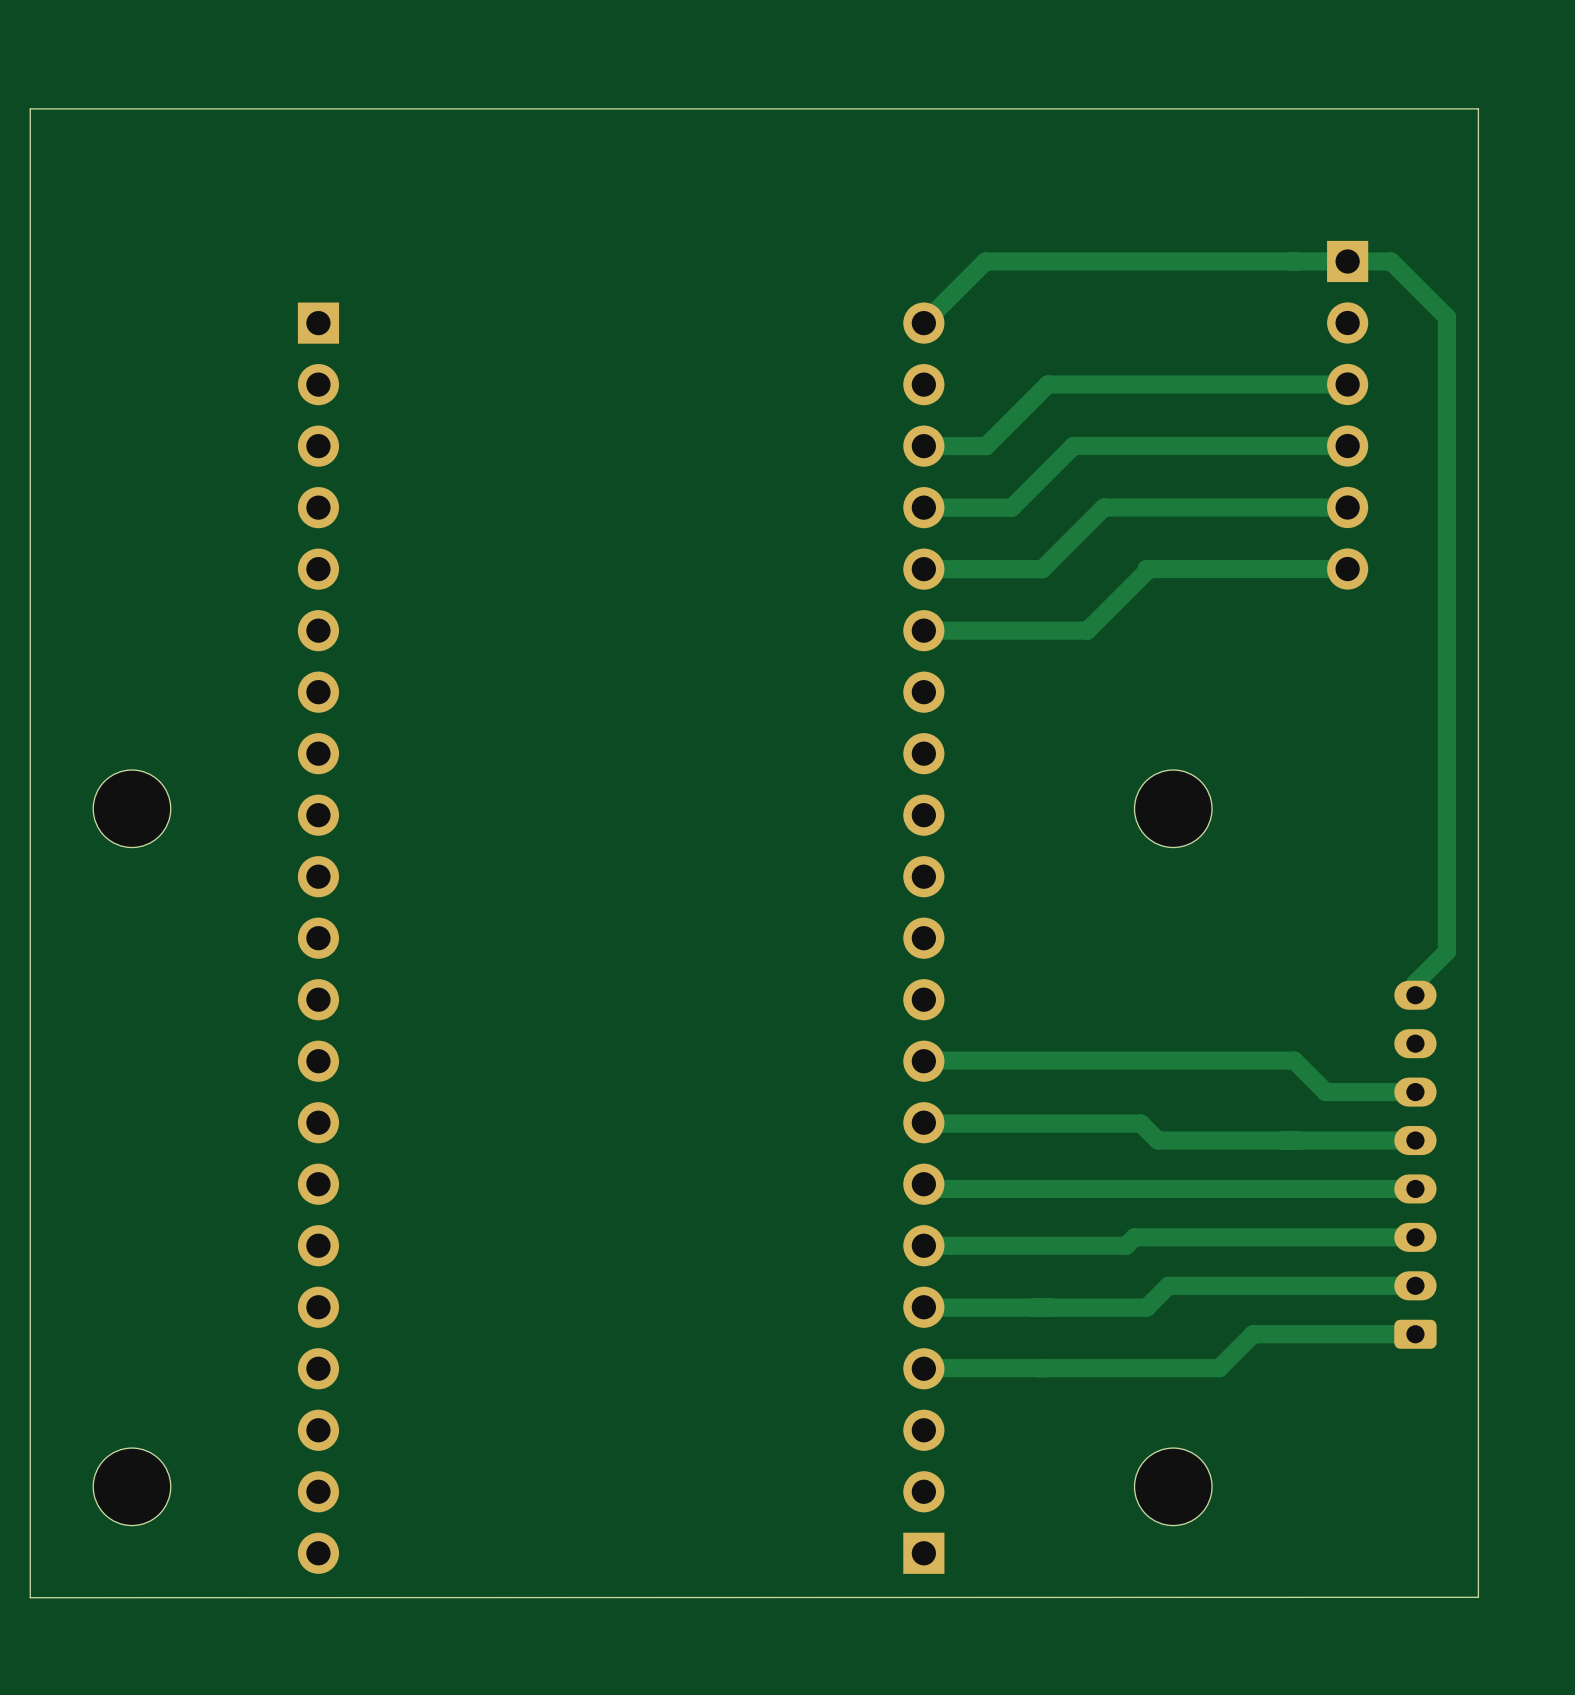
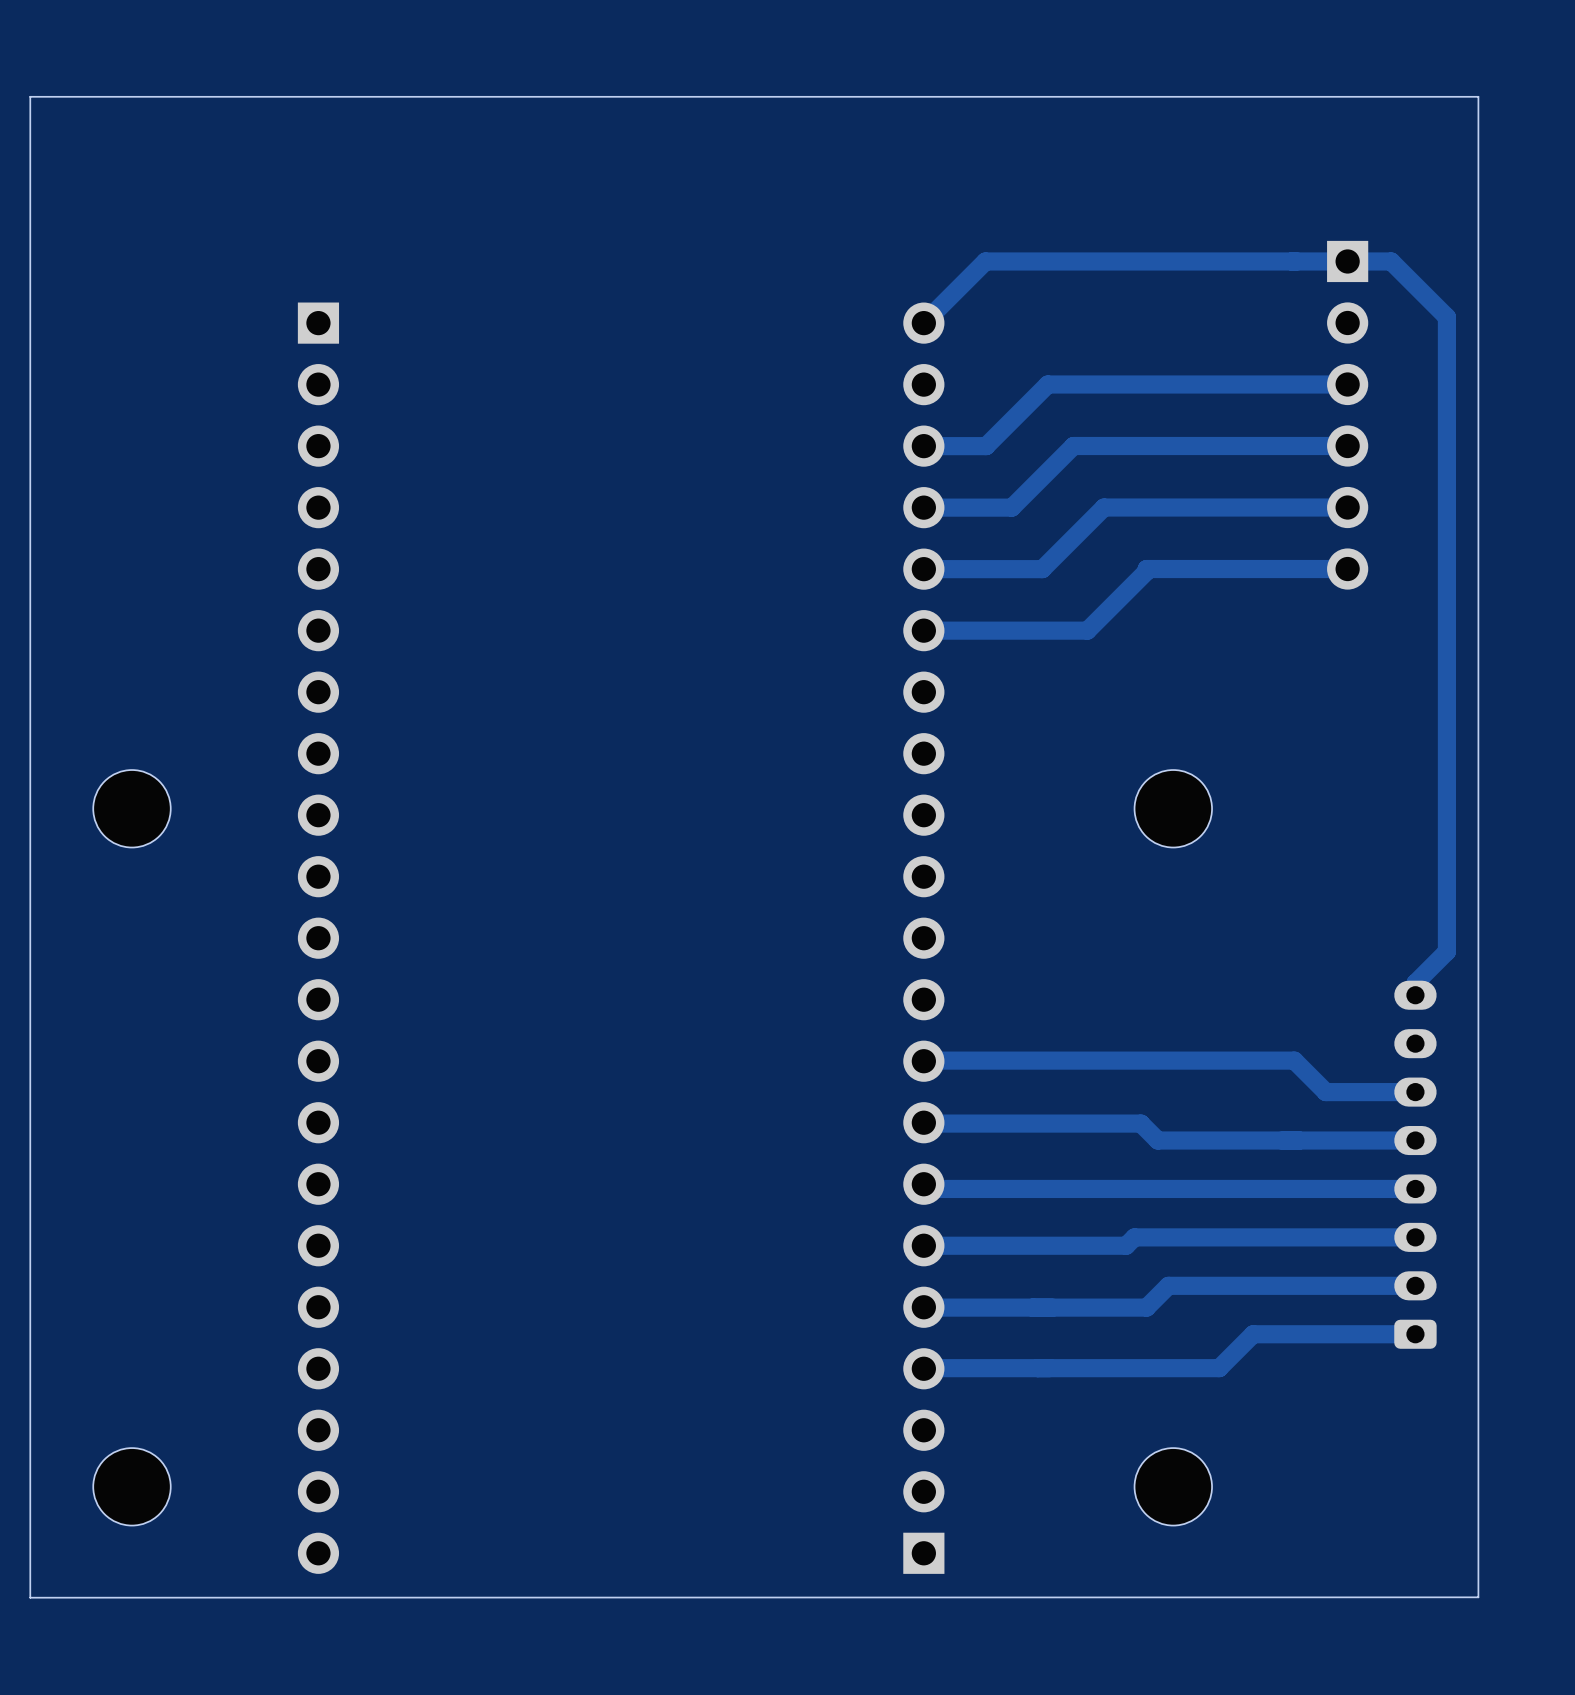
board edge: (1478, 108) (30, 108) -> (1478, 108) (1478, 96) (30, 96) (30, 108)

